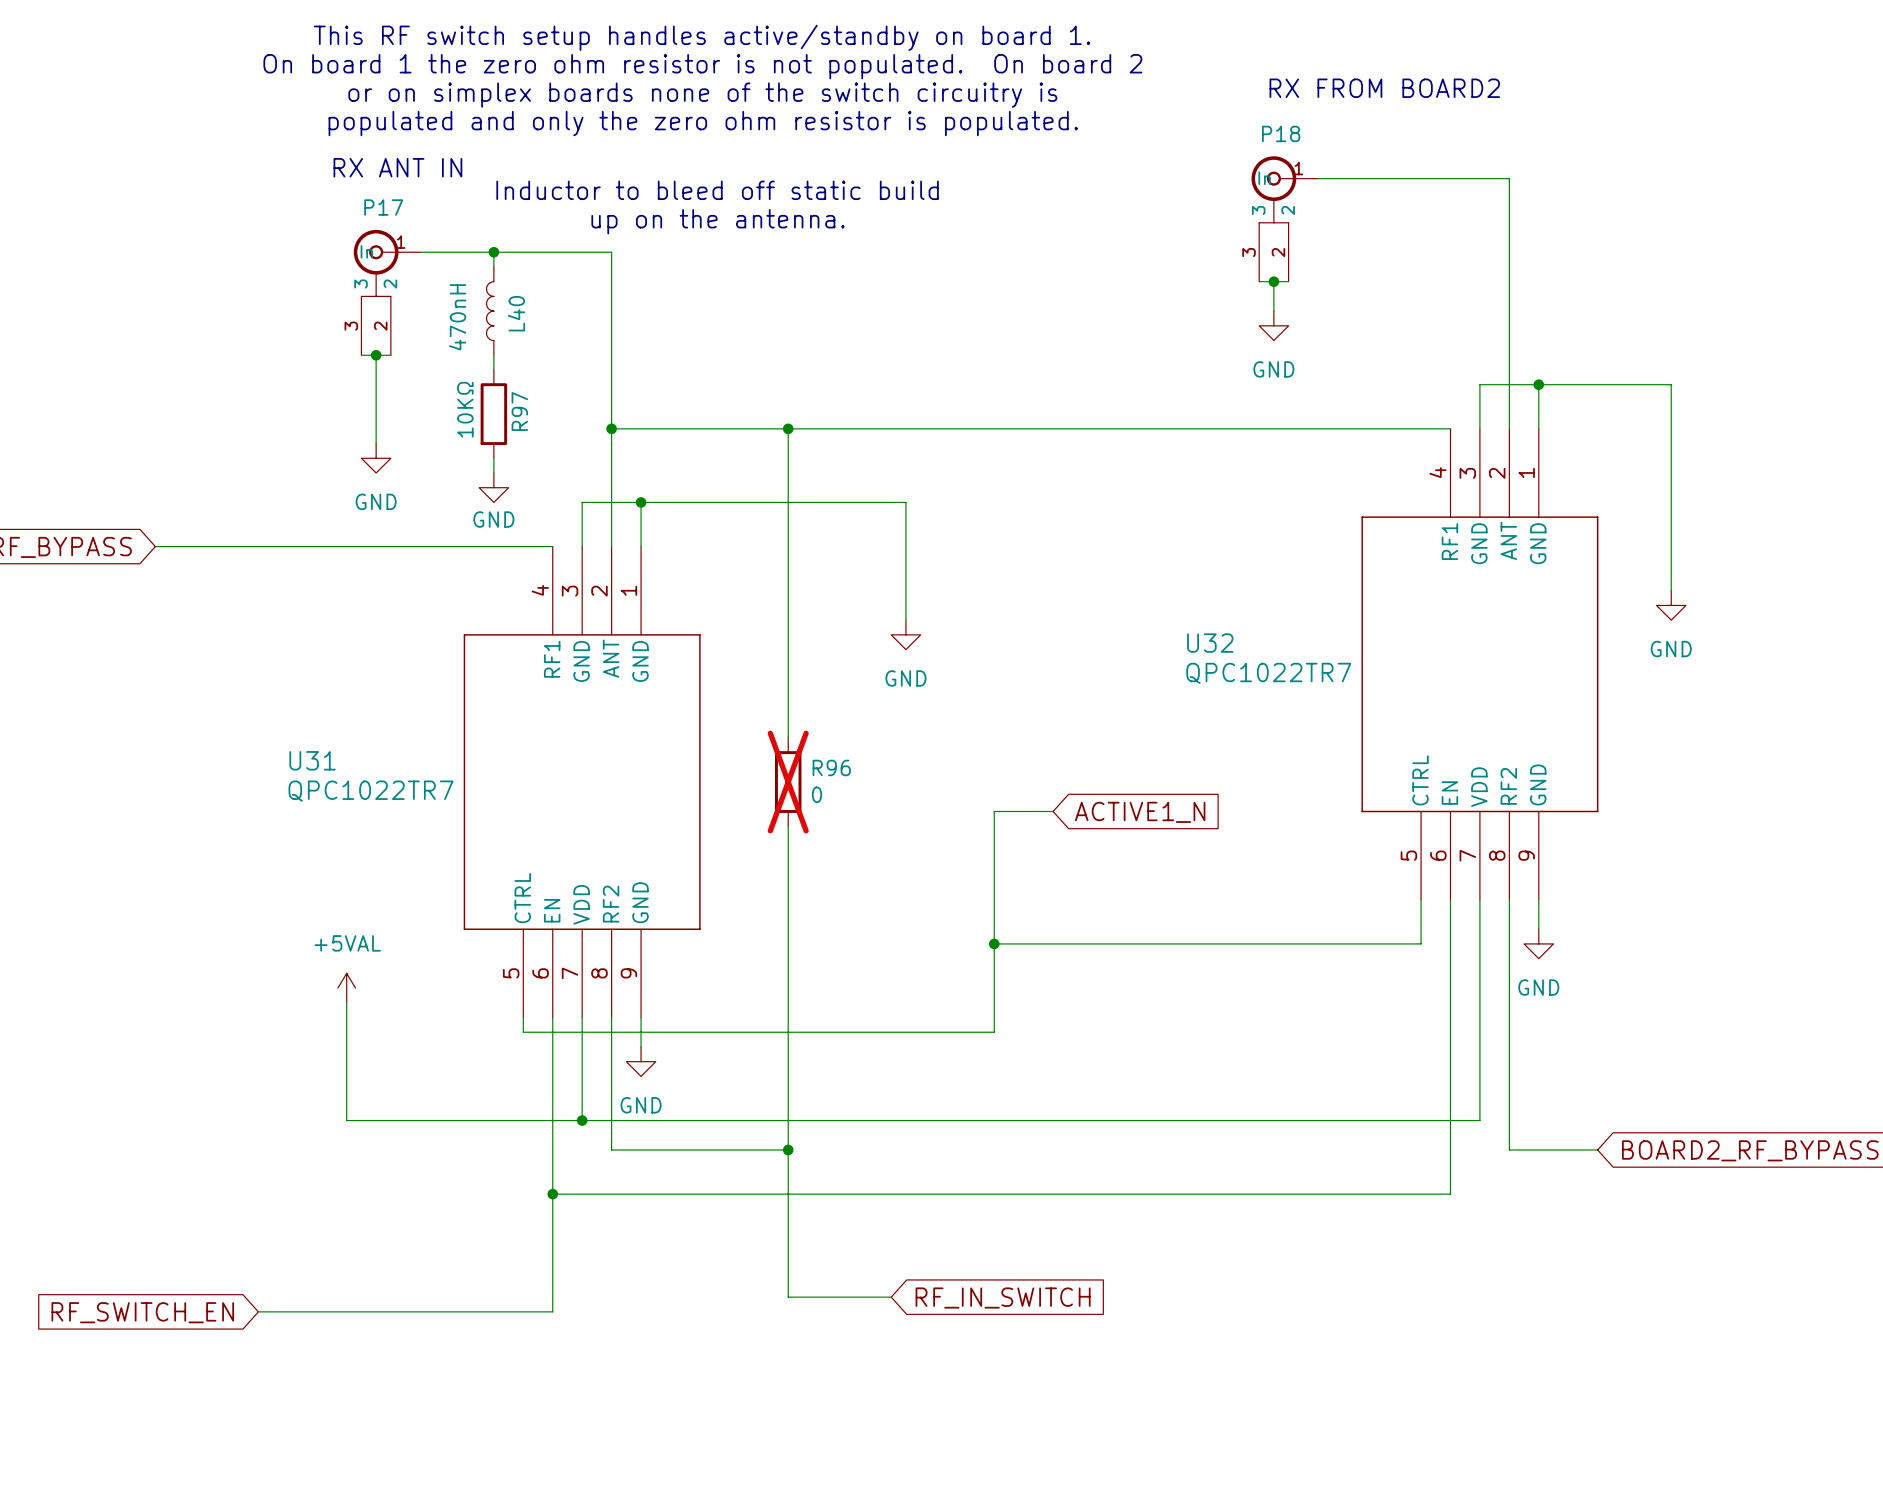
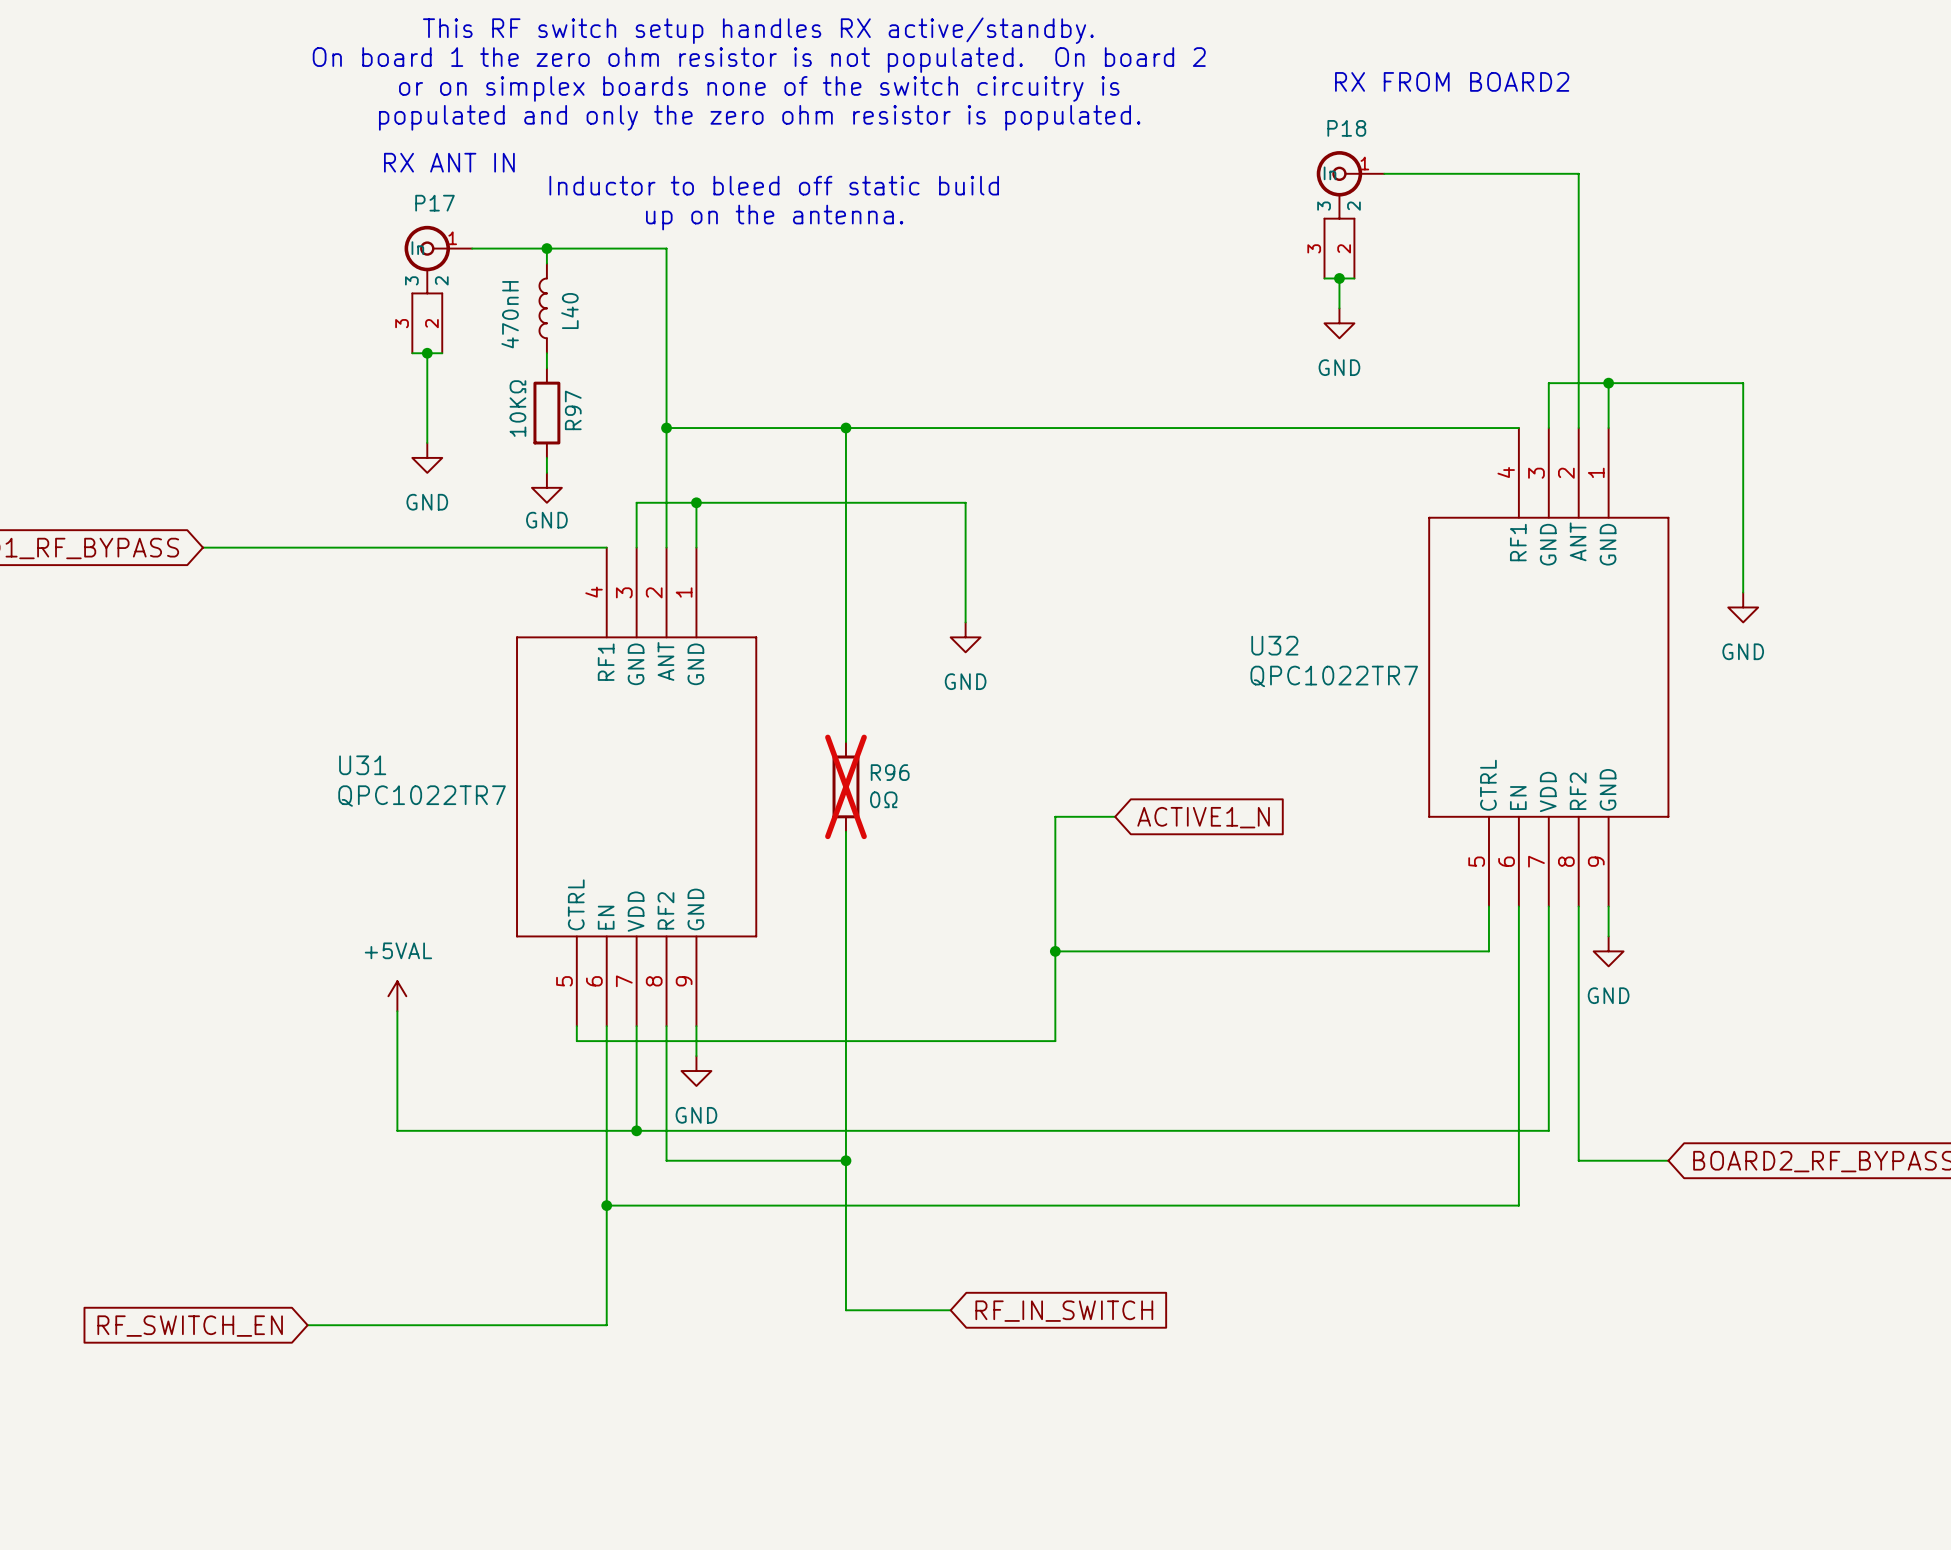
text: This RF switch setup handles active/standby on board 1. (702, 37) -> This RF switch setup handles RX active/standby. (758, 30)
R96 value: 0 (816, 794) -> 0Ω (883, 799)

